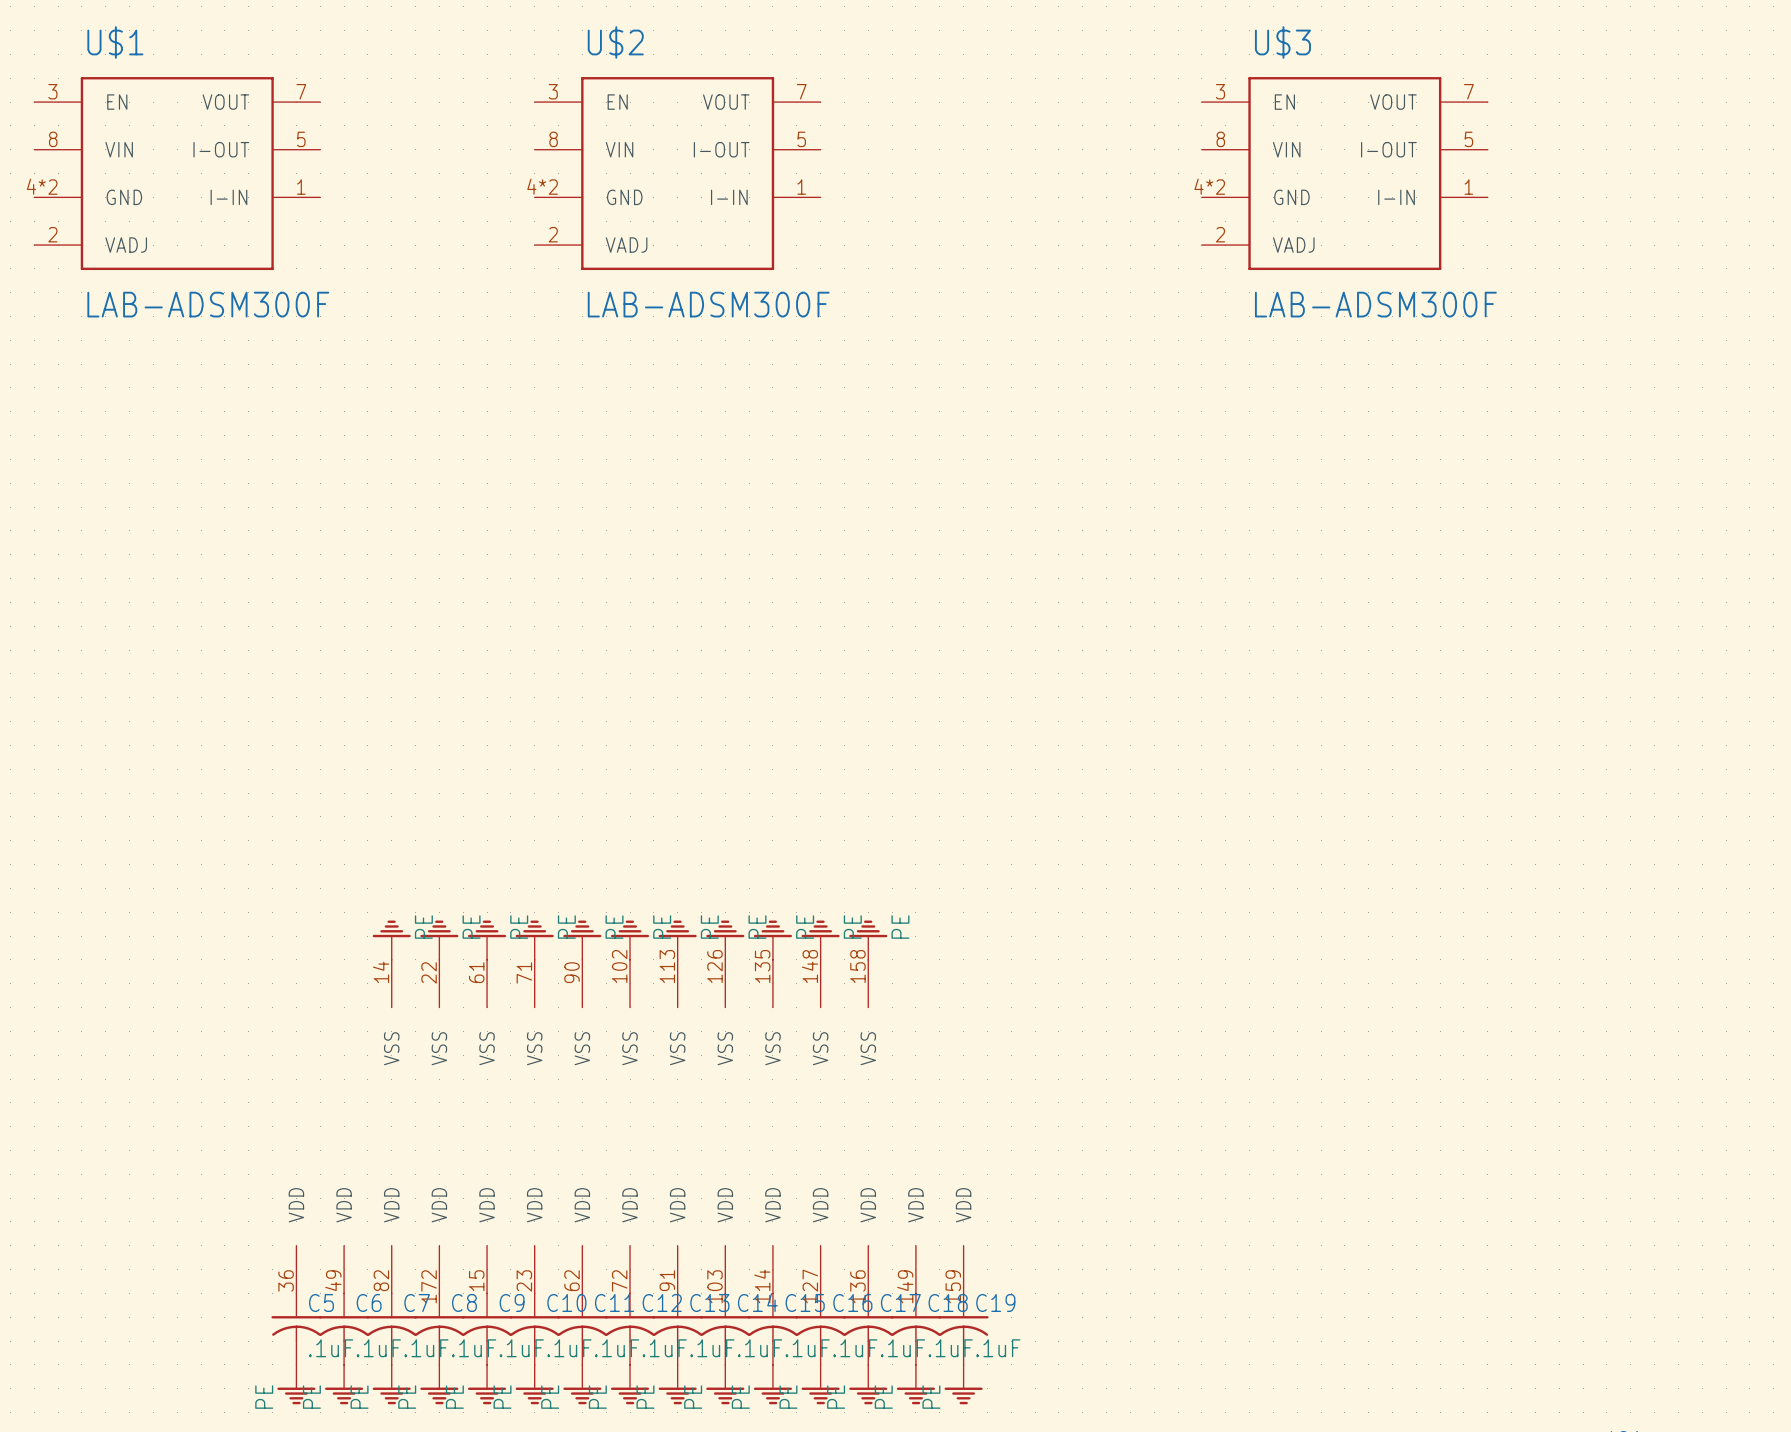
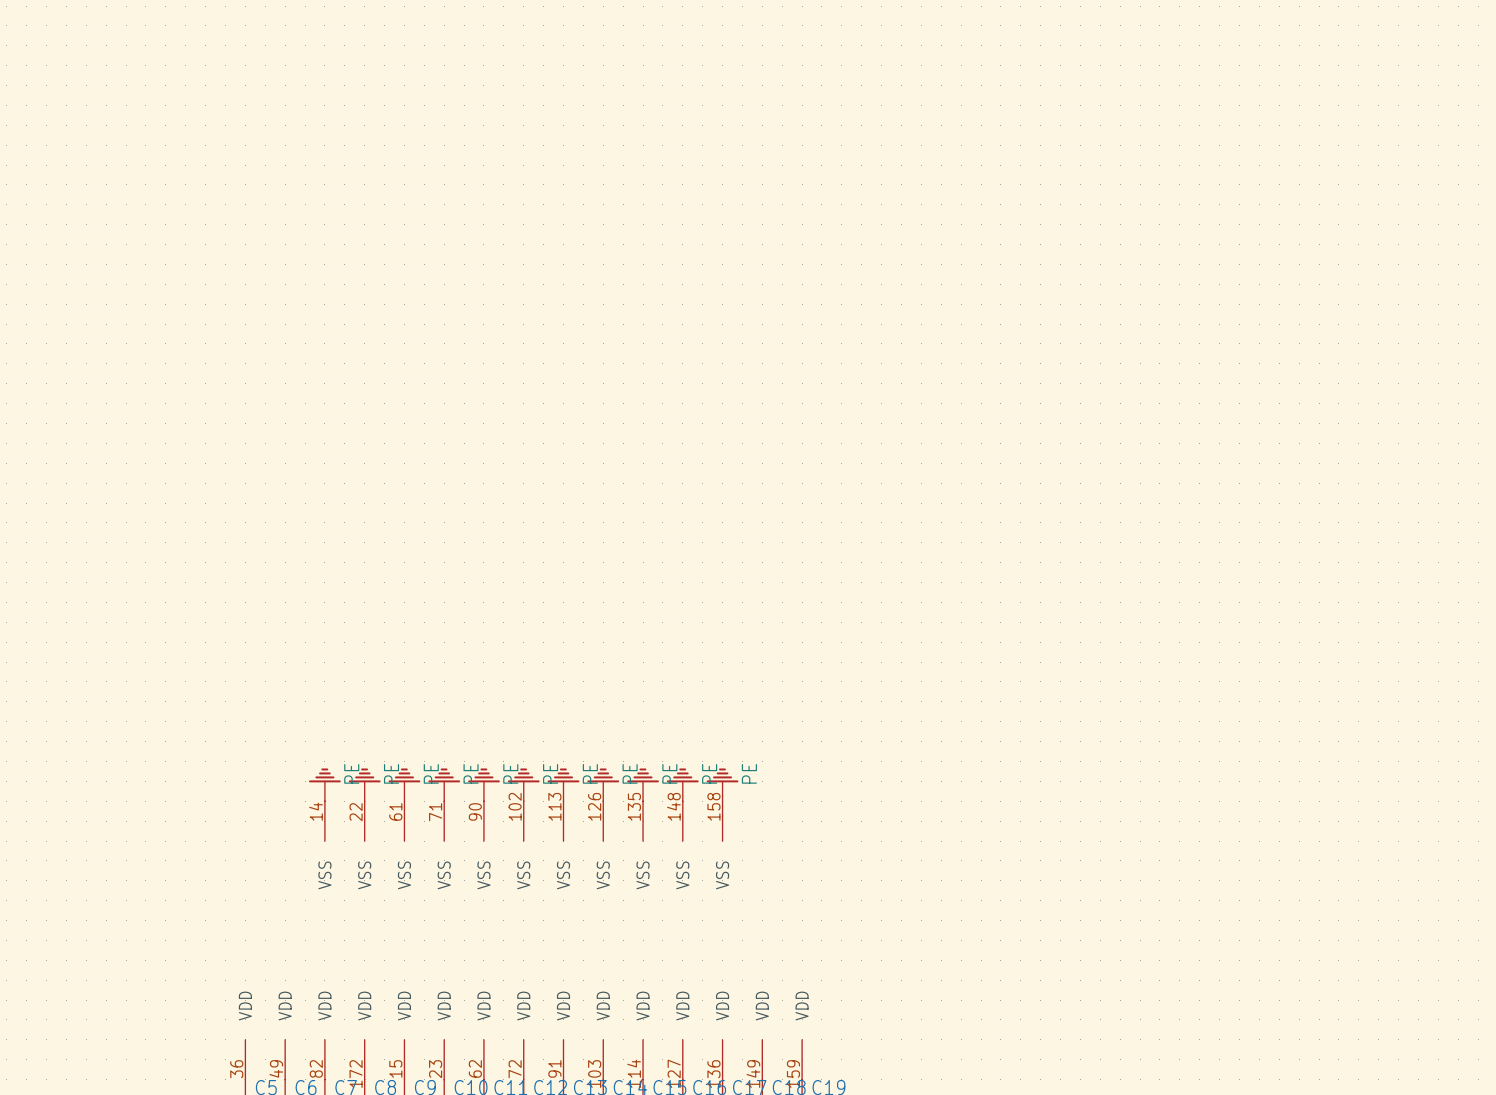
U$1: LAB-ADSM300F (177, 173) -> none
U$2: LAB-ADSM300F (677, 173) -> none
U$3: LAB-ADSM300F (1344, 173) -> none

